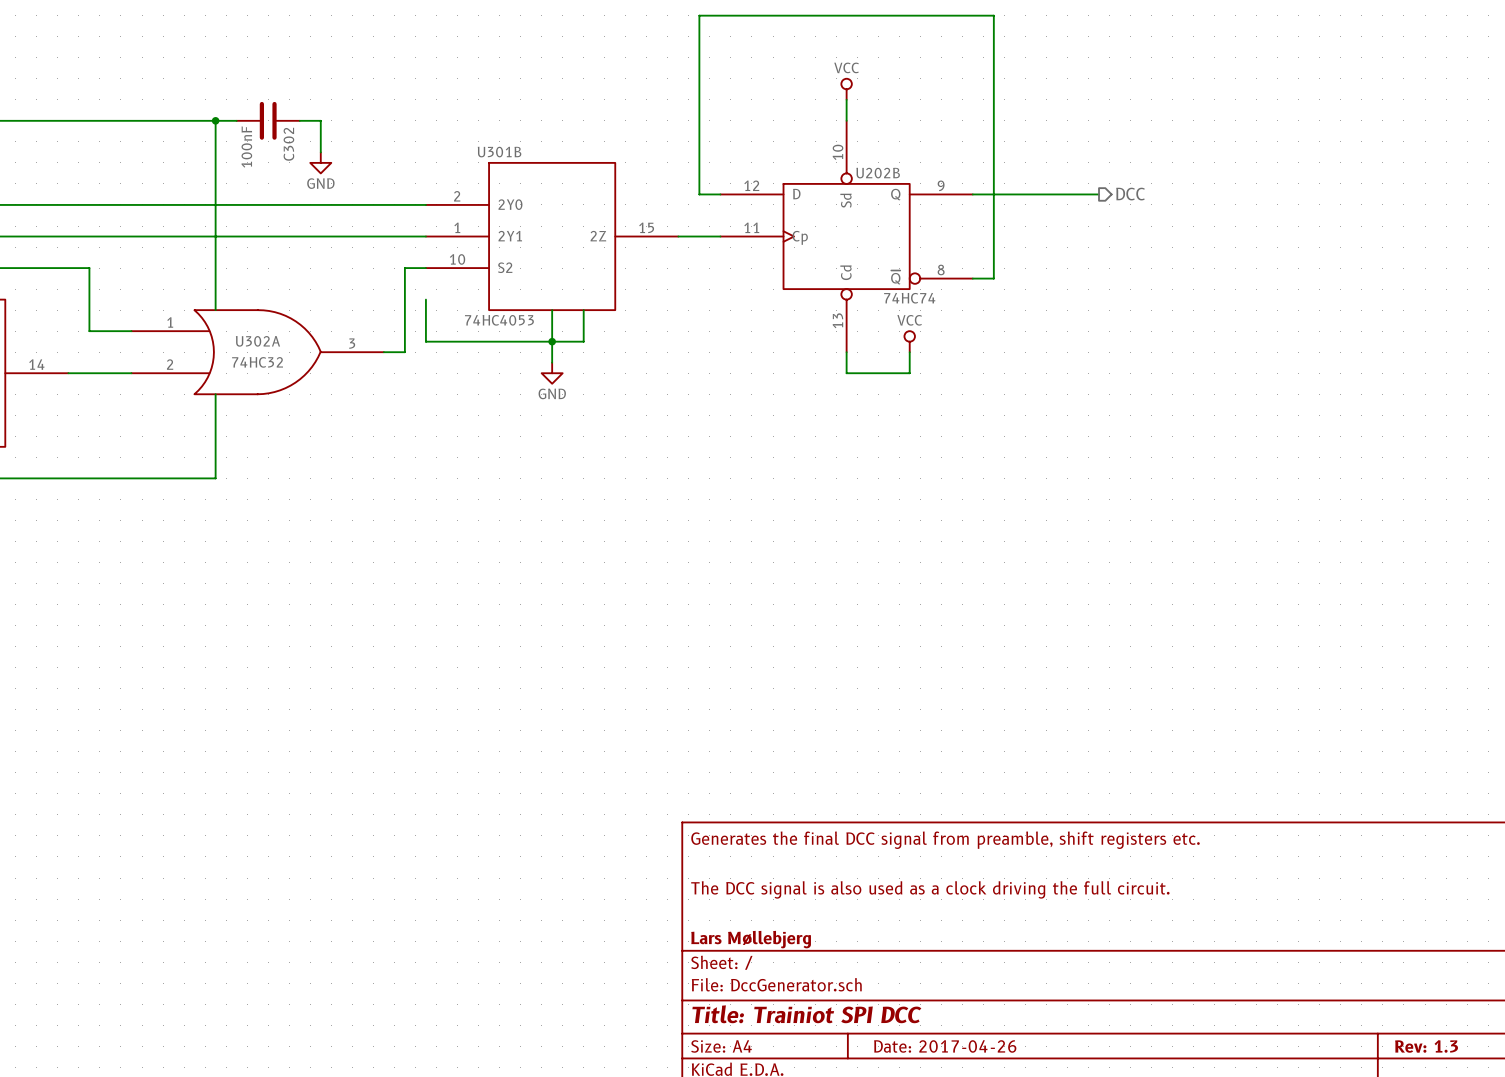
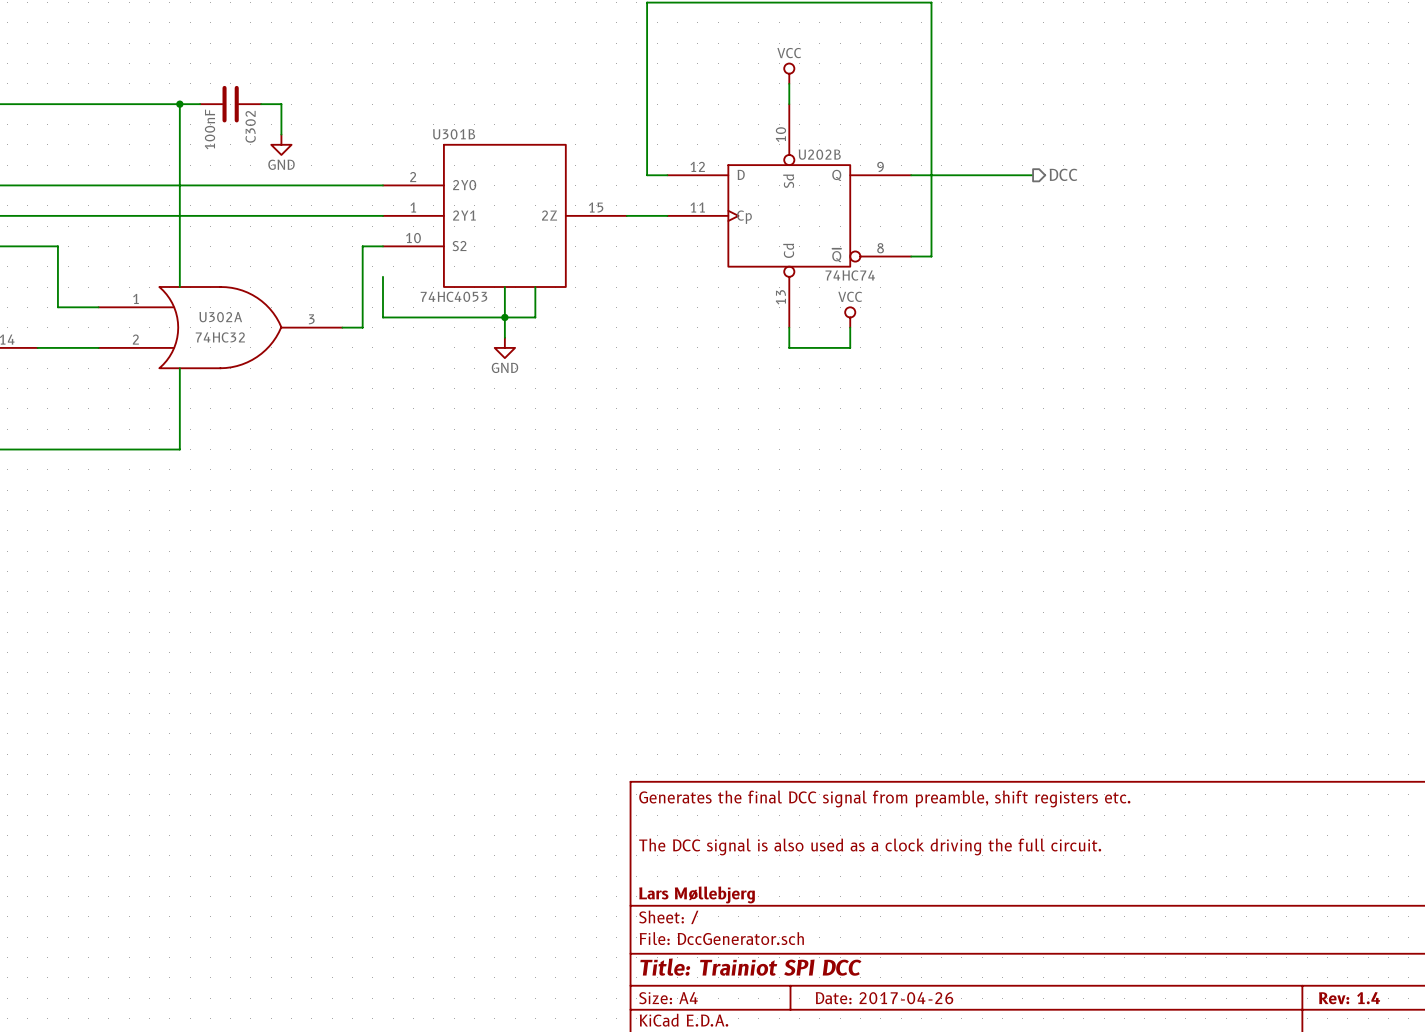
title block: Rev: 1.3 (1426, 1046) -> Rev: 1.4 (1349, 998)

